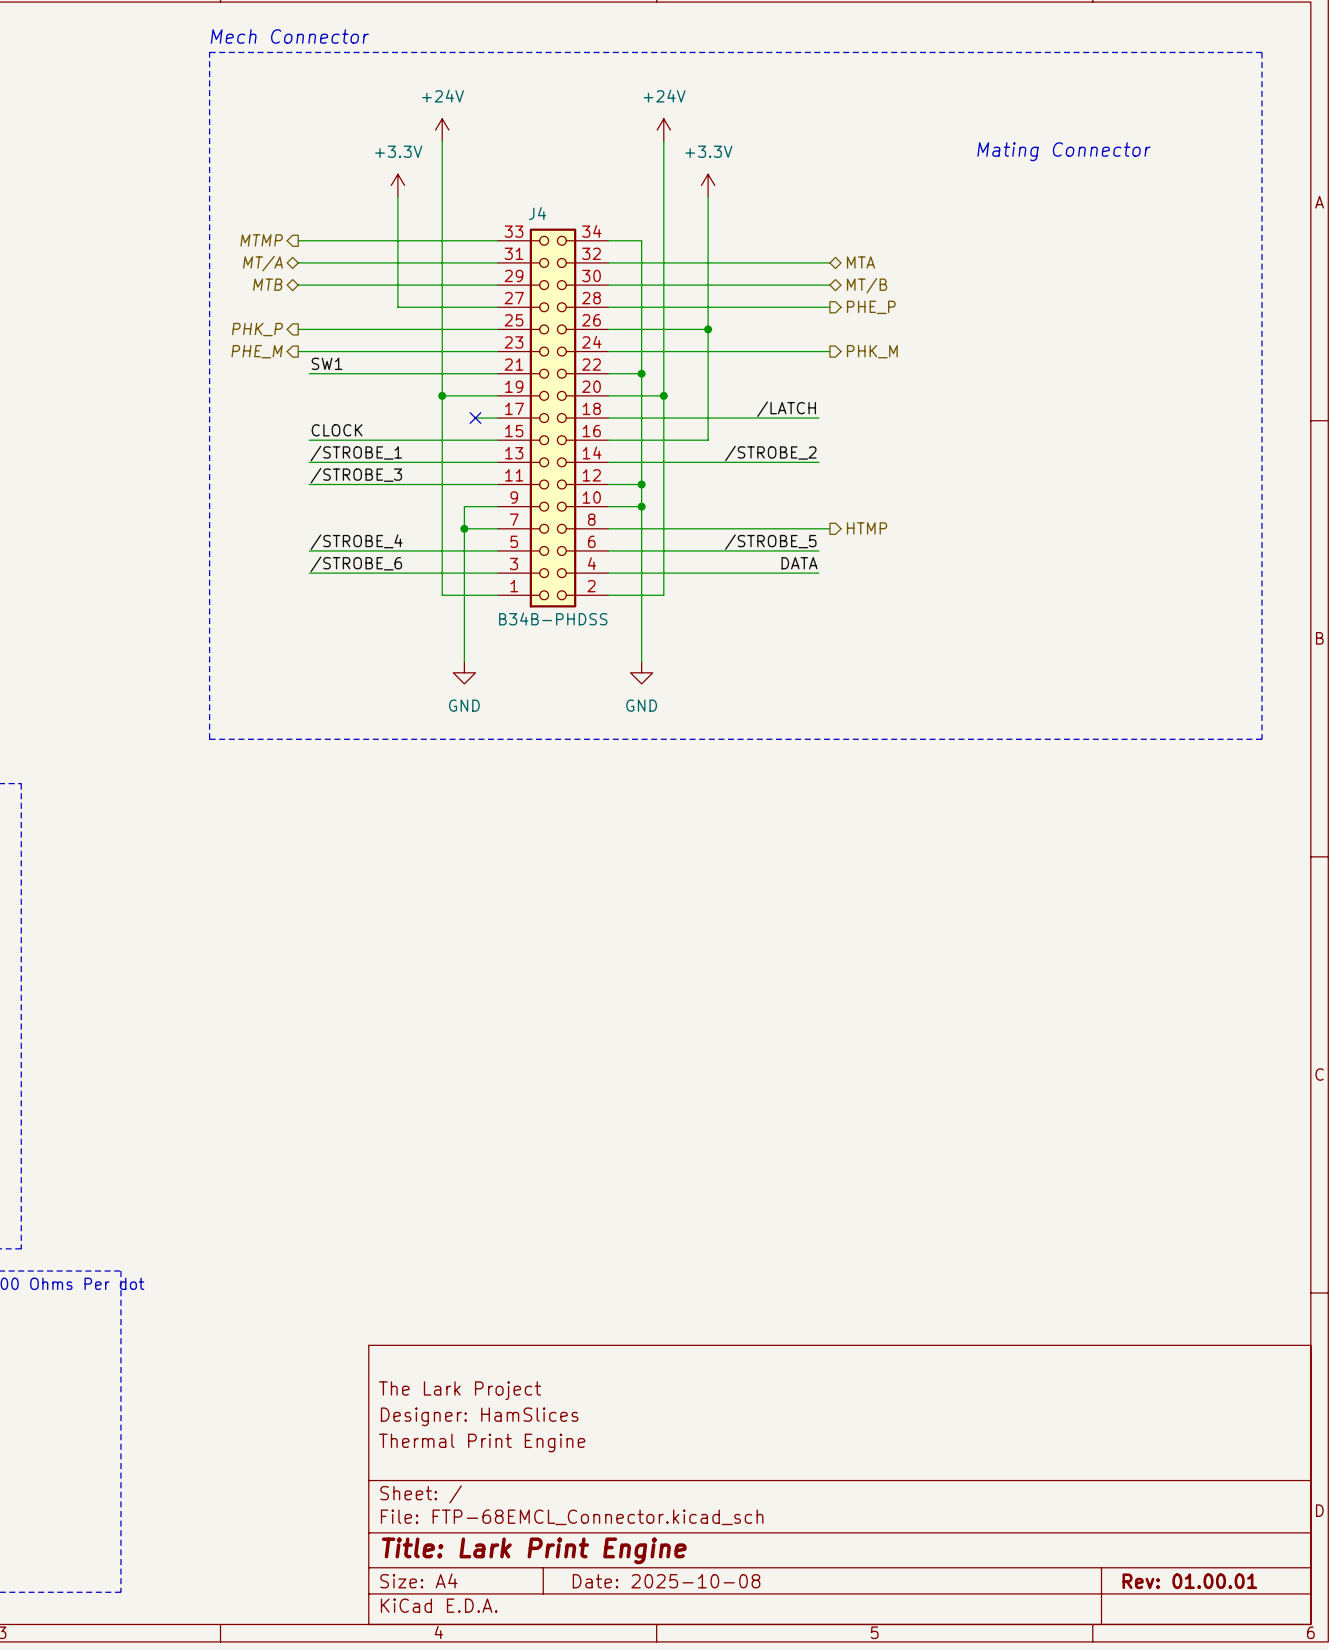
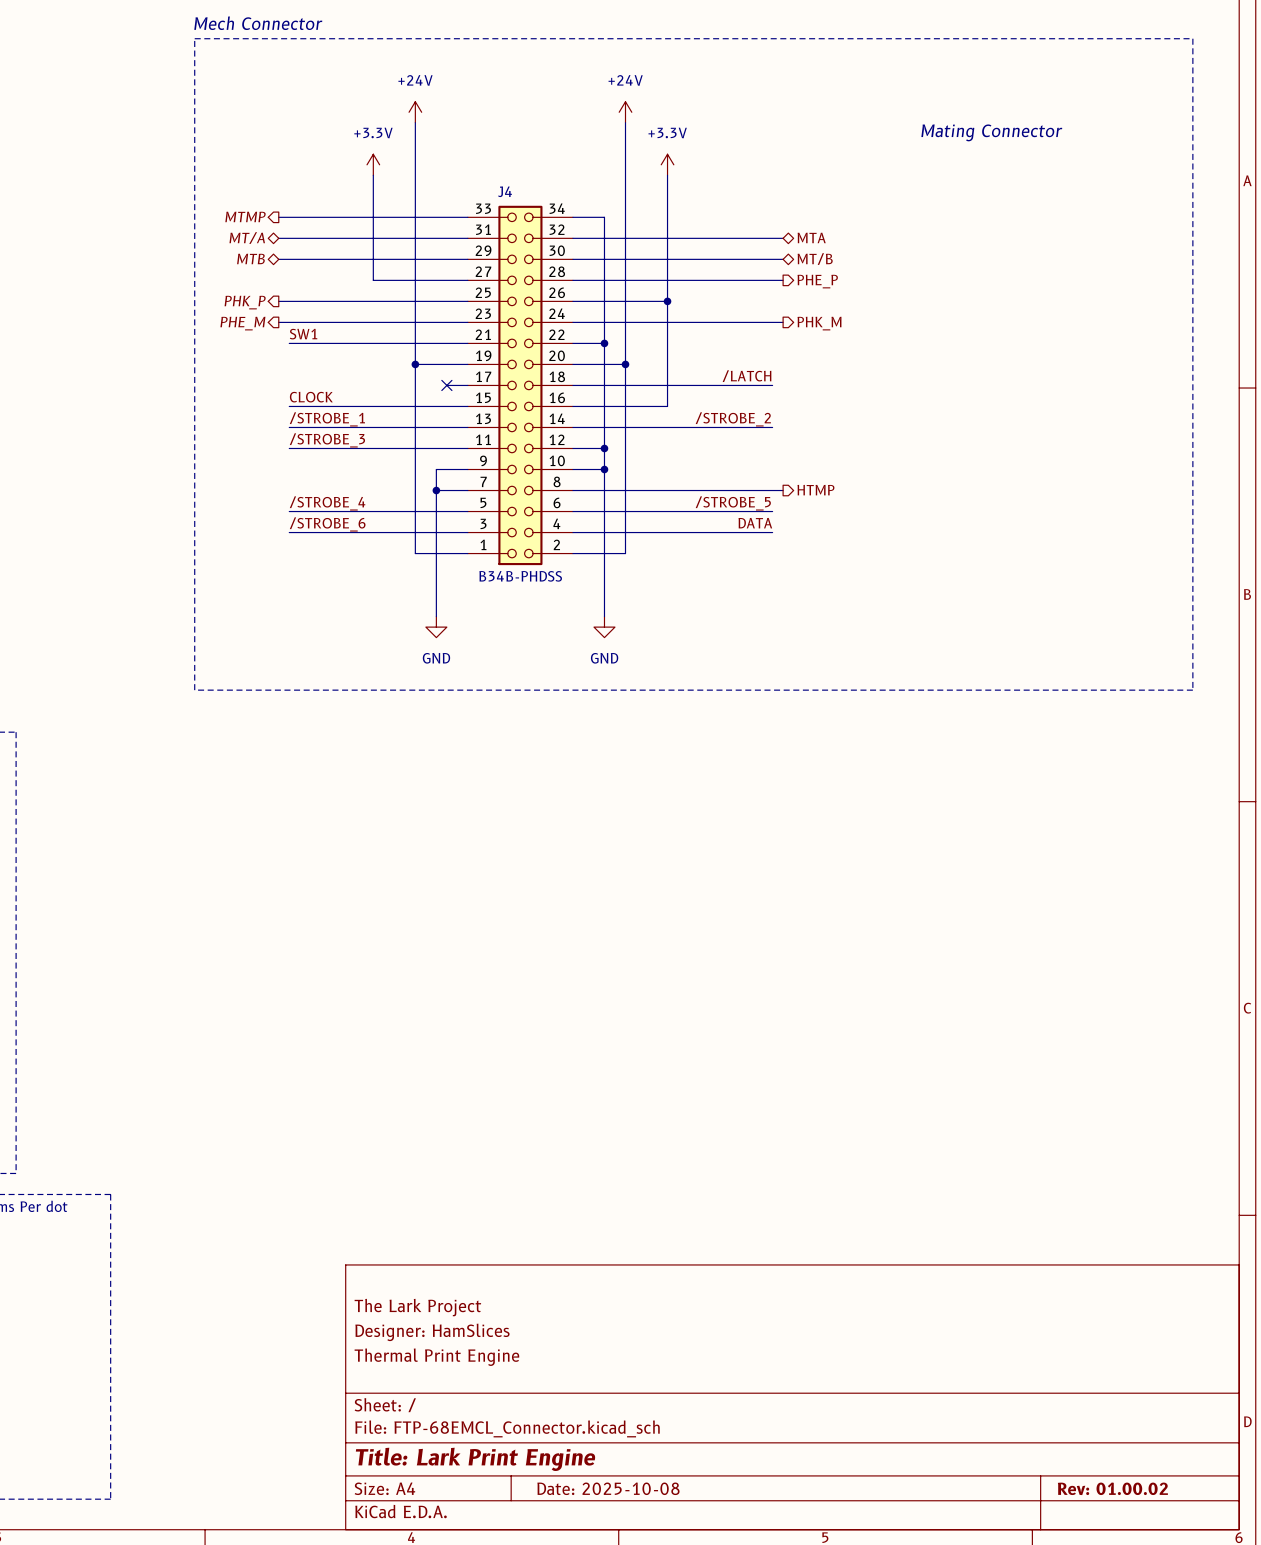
title block: Rev: 01.00.01 (1189, 1581) -> Rev: 01.00.02 (1112, 1488)

